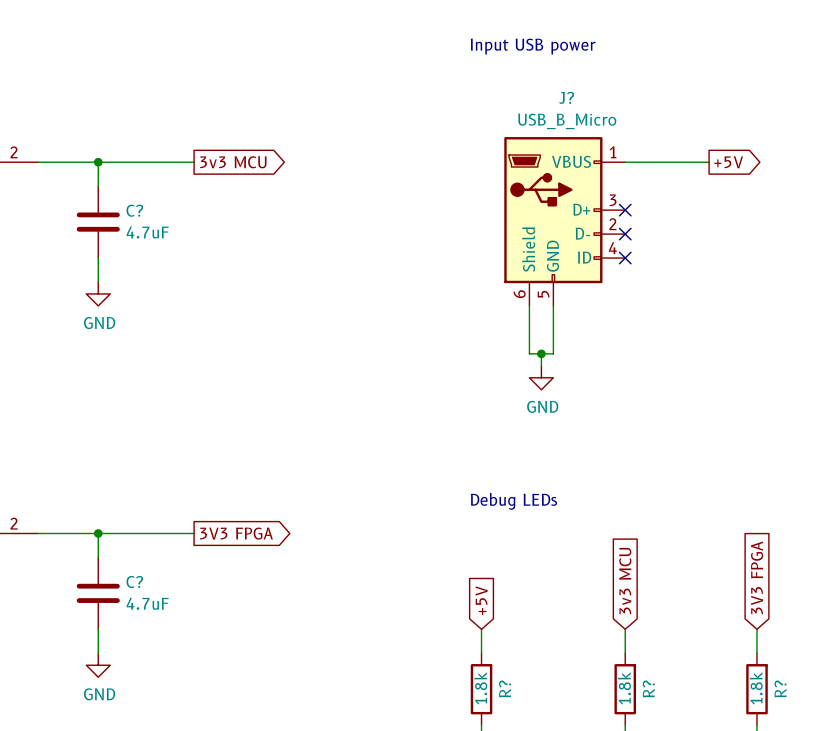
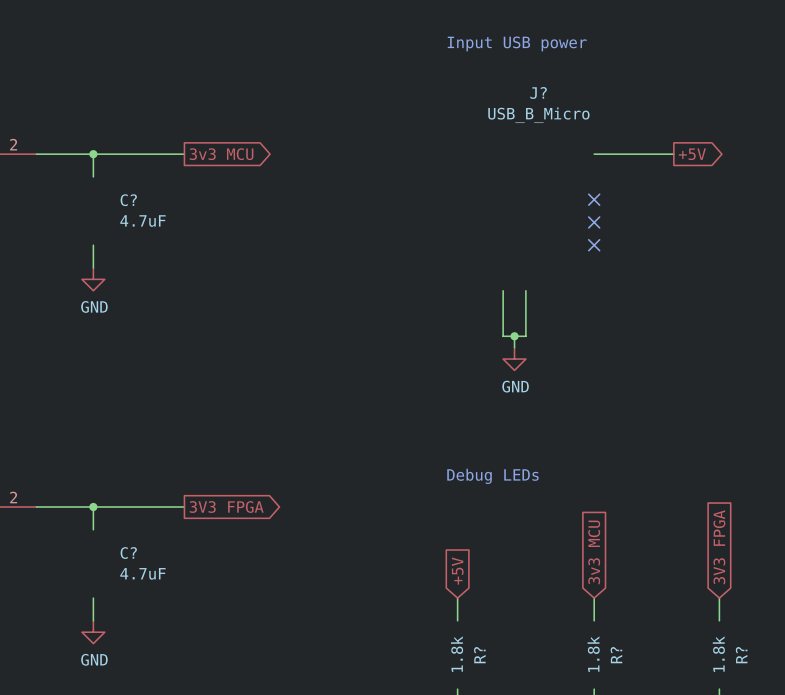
J?: USB_B_Micro (564, 221) -> none
C?: 4.7uF (98, 222) -> none
C?: 4.7uF (98, 593) -> none
R?: none -> 1.8k (468, 654)
R?: none -> 1.8k (604, 654)
R?: none -> 1.8k (730, 654)
R?: 1.8k (481, 689) -> none
R?: 1.8k (625, 689) -> none
R?: 1.8k (756, 689) -> none

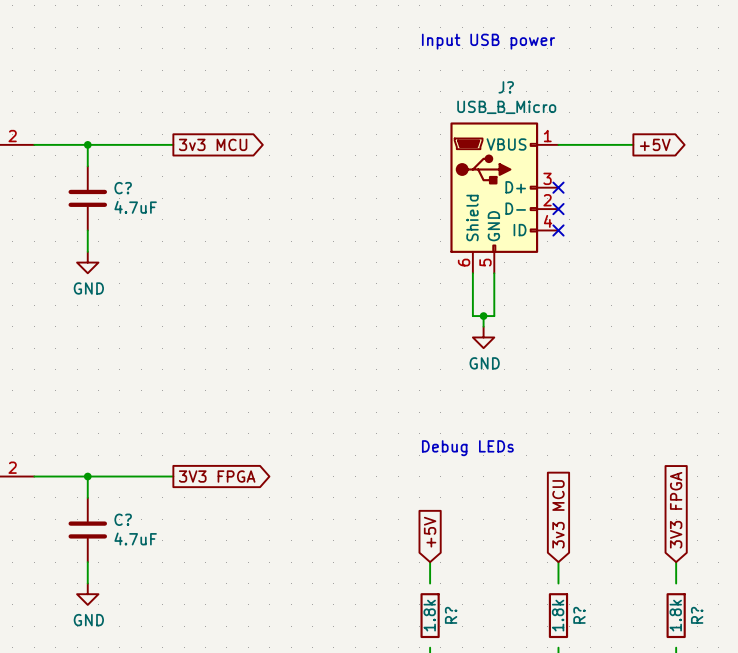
J?: none -> USB_B_Micro (504, 197)
C?: none -> 4.7uF (87, 198)
C?: none -> 4.7uF (87, 530)
R?: none -> 1.8k (430, 615)
R?: 1.8k (468, 654) -> none
R?: none -> 1.8k (558, 615)
R?: 1.8k (604, 654) -> none
R?: none -> 1.8k (676, 615)
R?: 1.8k (730, 654) -> none

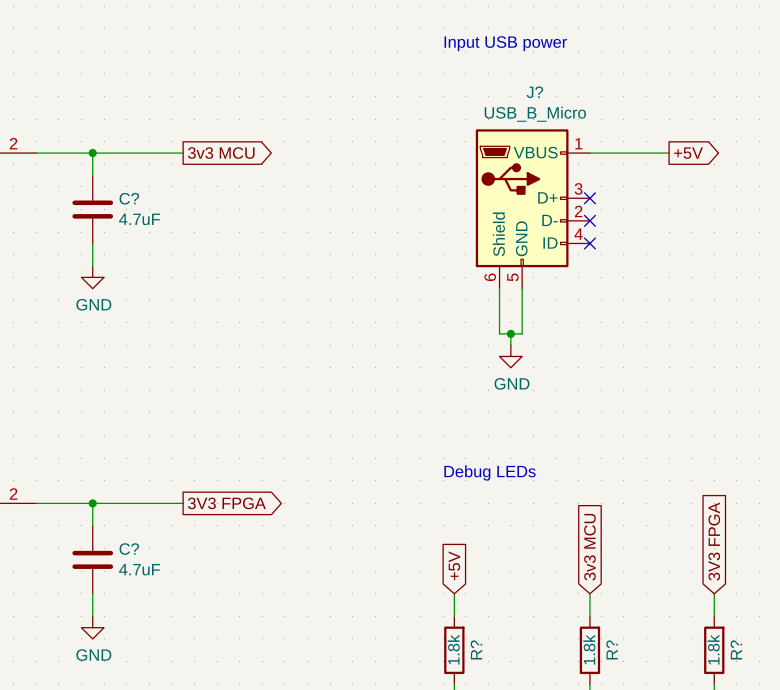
R? symbol: [420, 593, 440, 639] -> [444, 616, 465, 685]
R? symbol: [548, 593, 569, 639] -> [579, 616, 601, 685]
R? symbol: [666, 593, 686, 639] -> [704, 616, 725, 685]

